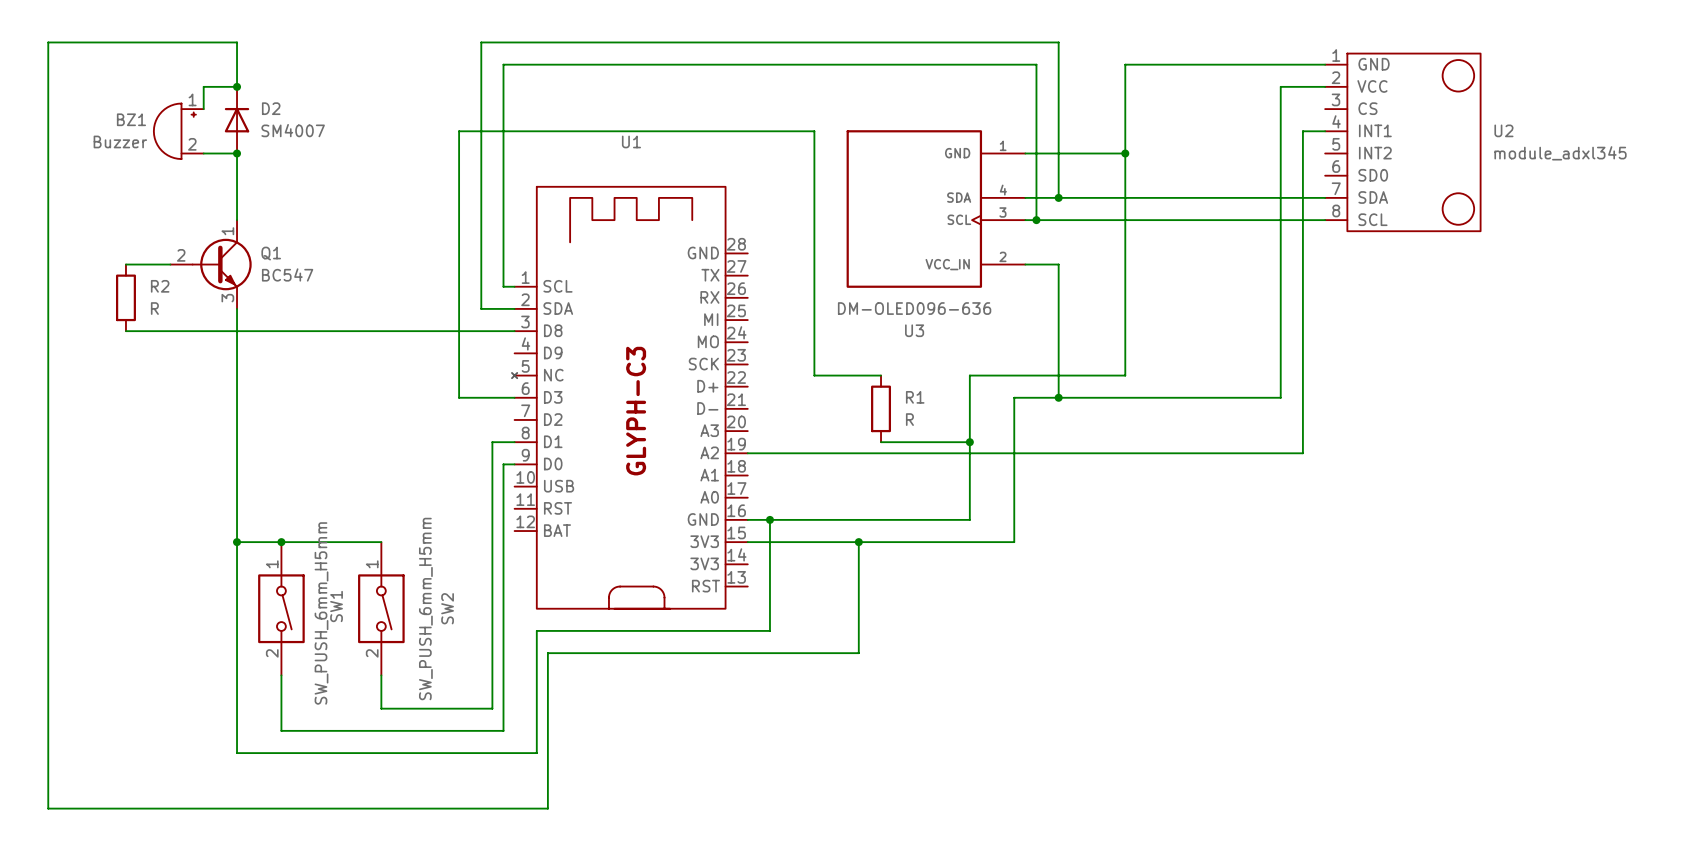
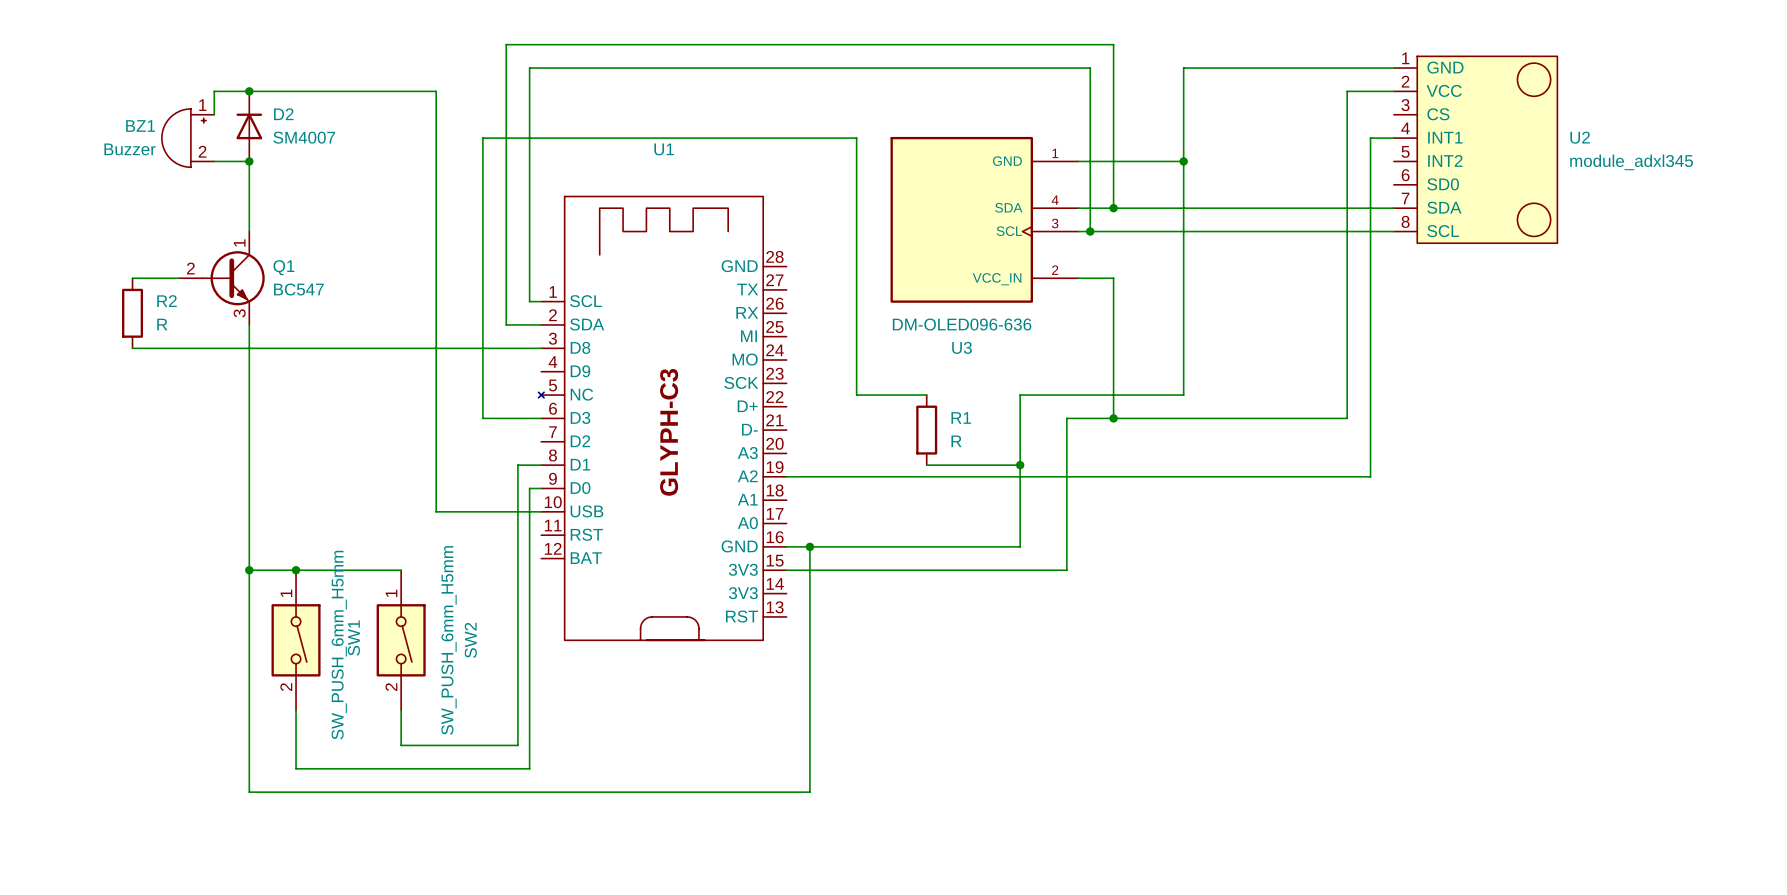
wire: (237, 86) (237, 42) (48, 42) (48, 808) (547, 808) (547, 653) (858, 653) (858, 542) -> (249, 91) (436, 91) (436, 511) (541, 511)
junction: (858, 542) -> none
wire: (769, 630) (536, 630) (536, 753) -> (809, 663) (809, 792) (564, 792)

